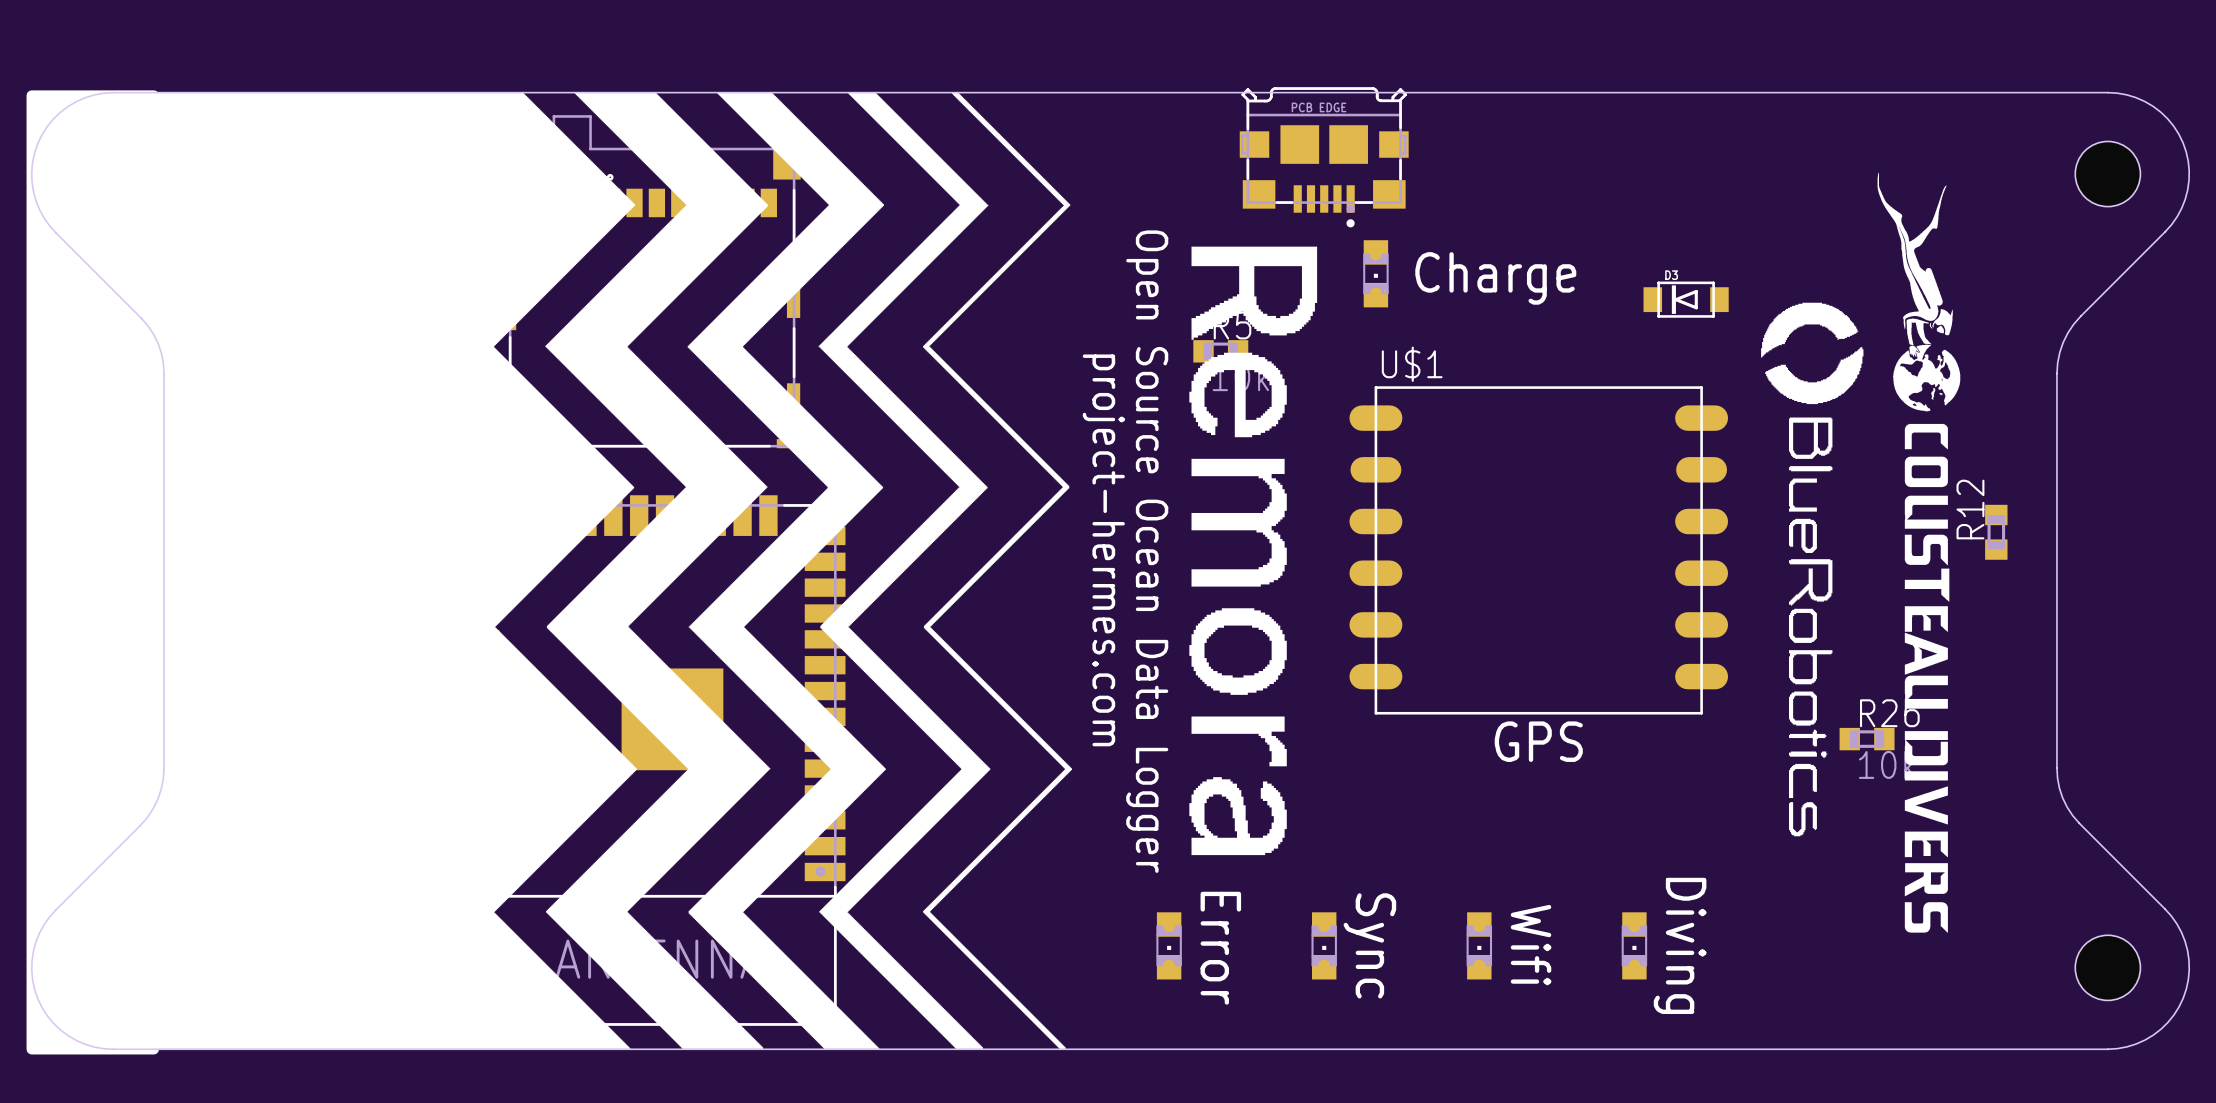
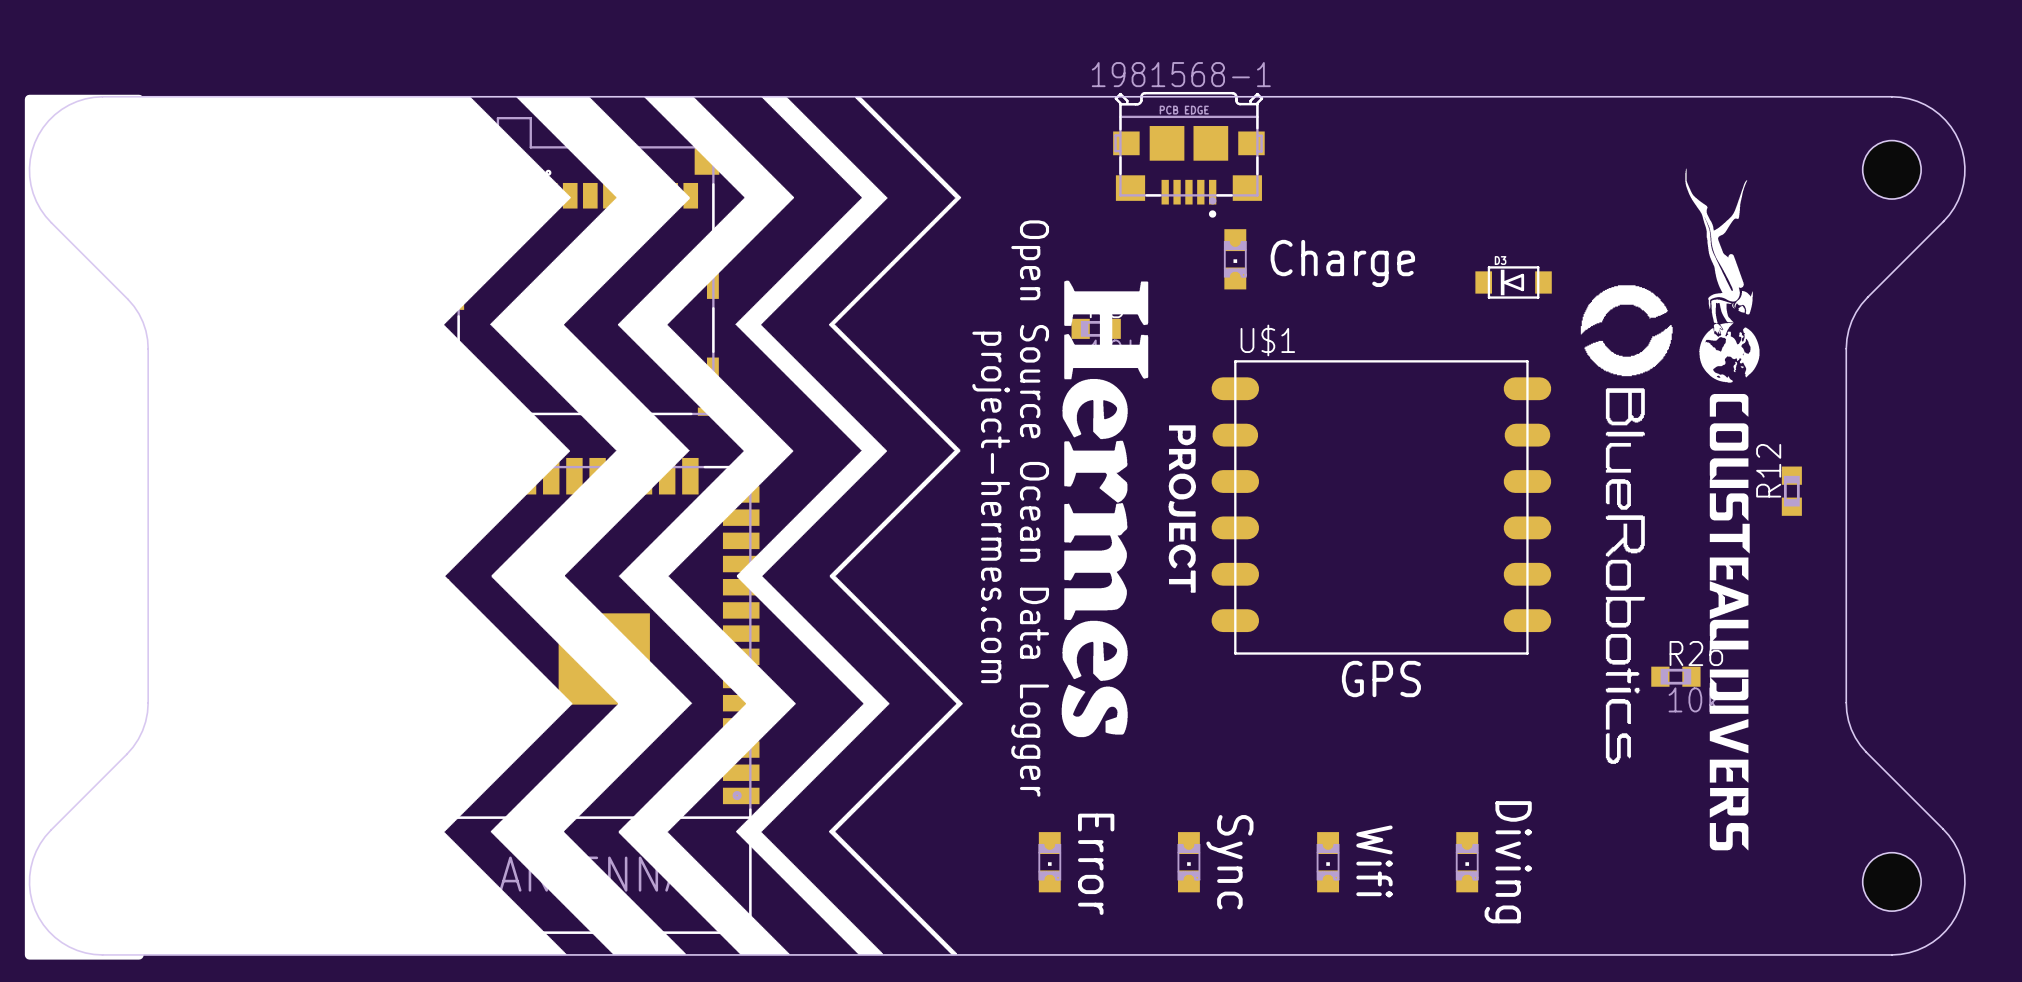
part value: none -> 1981568-1 (1181, 74)
drawing shape: [1189, 246, 1318, 856] -> [1061, 280, 1196, 738]

